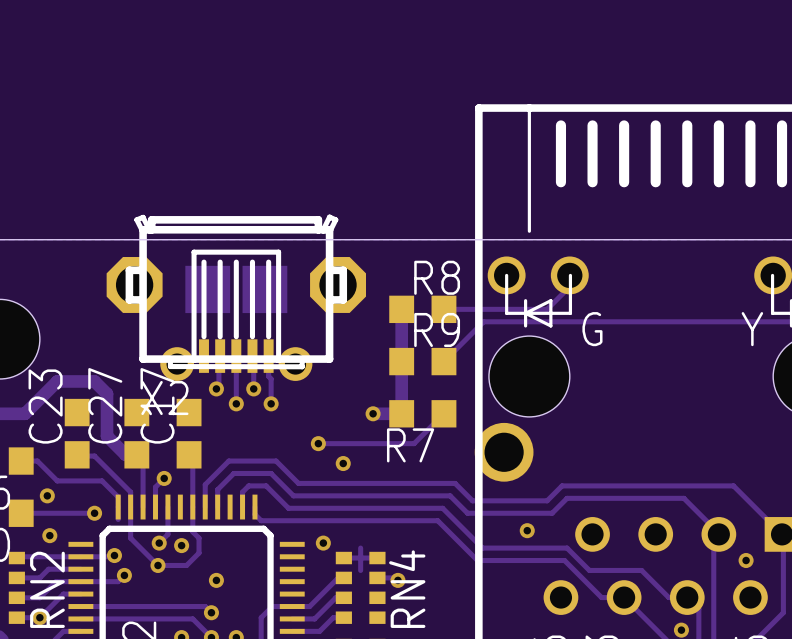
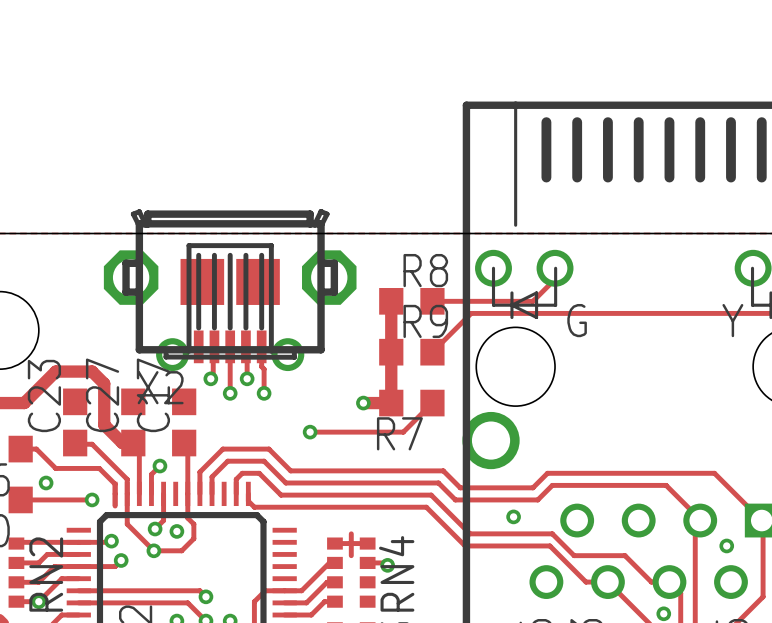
via: (343, 463) -> none
via: (49, 535) -> none
via: (323, 543) -> none
via: (216, 580) -> none

